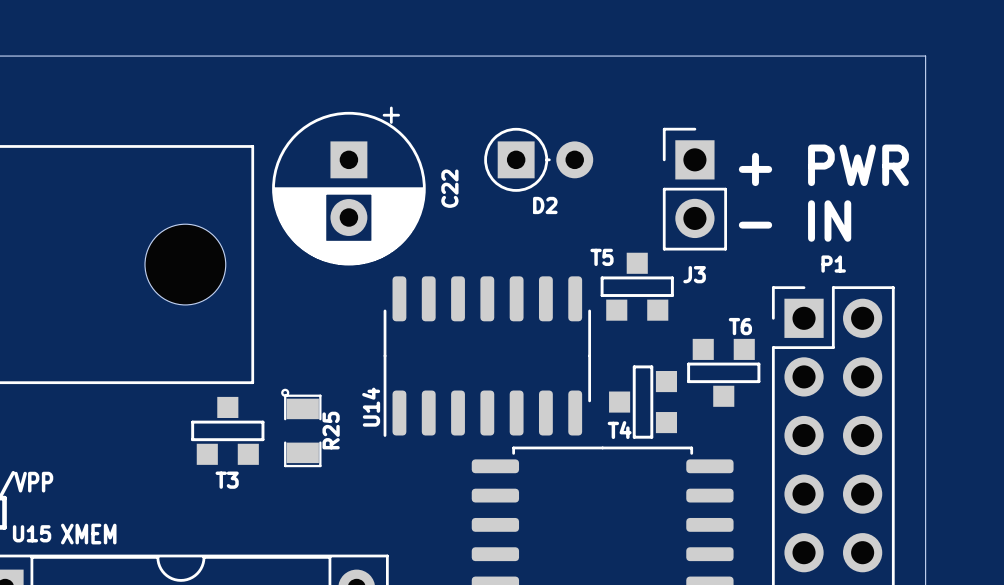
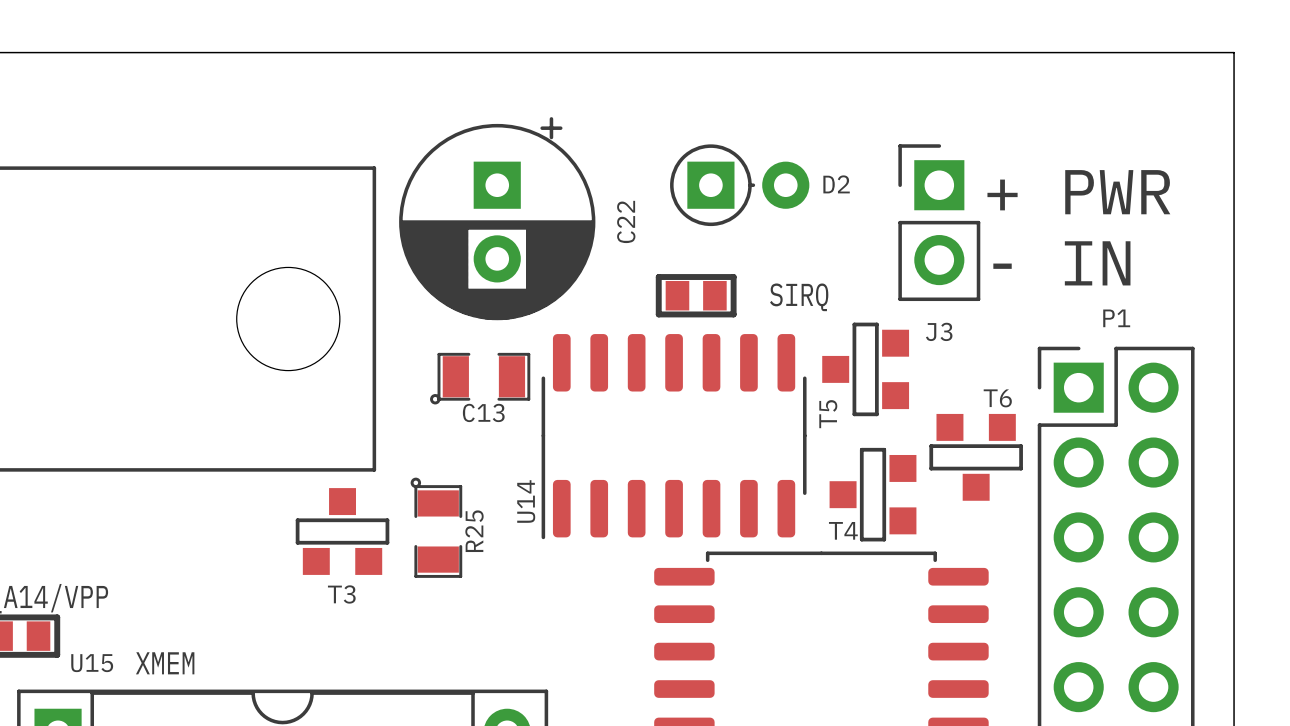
D2 name position: D2 (545, 205) -> D2 (836, 184)
part: none -> SIRQ (696, 295)
T5 rotation: 0° (637, 286) -> 90° counterclockwise (865, 369)
C13: none -> (480, 378)

